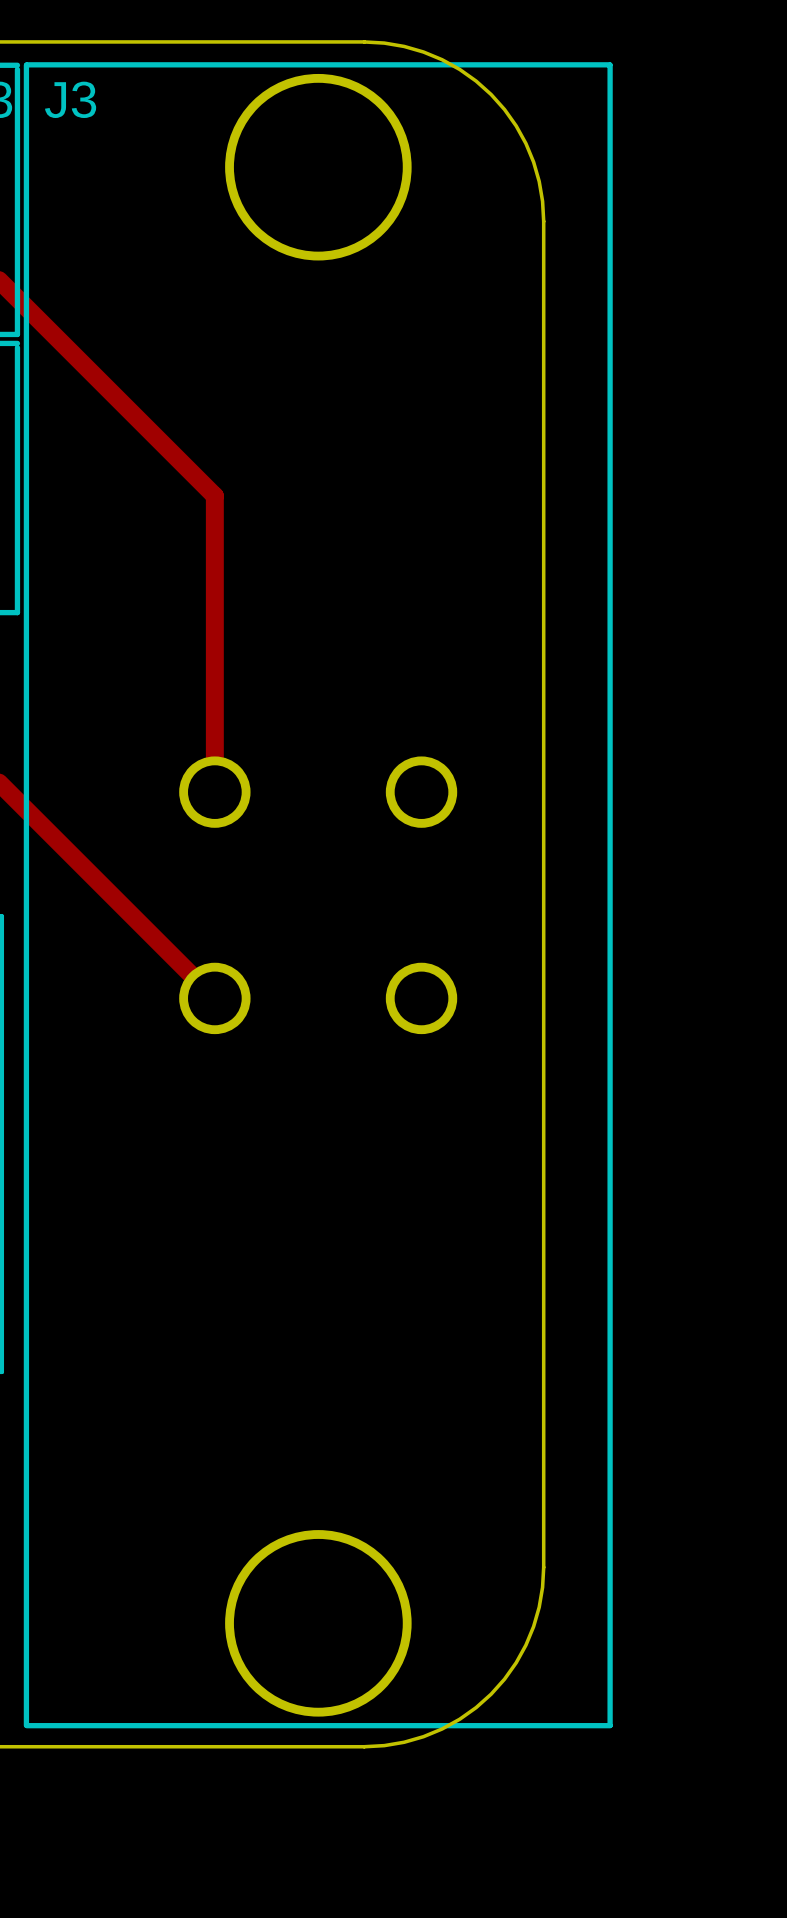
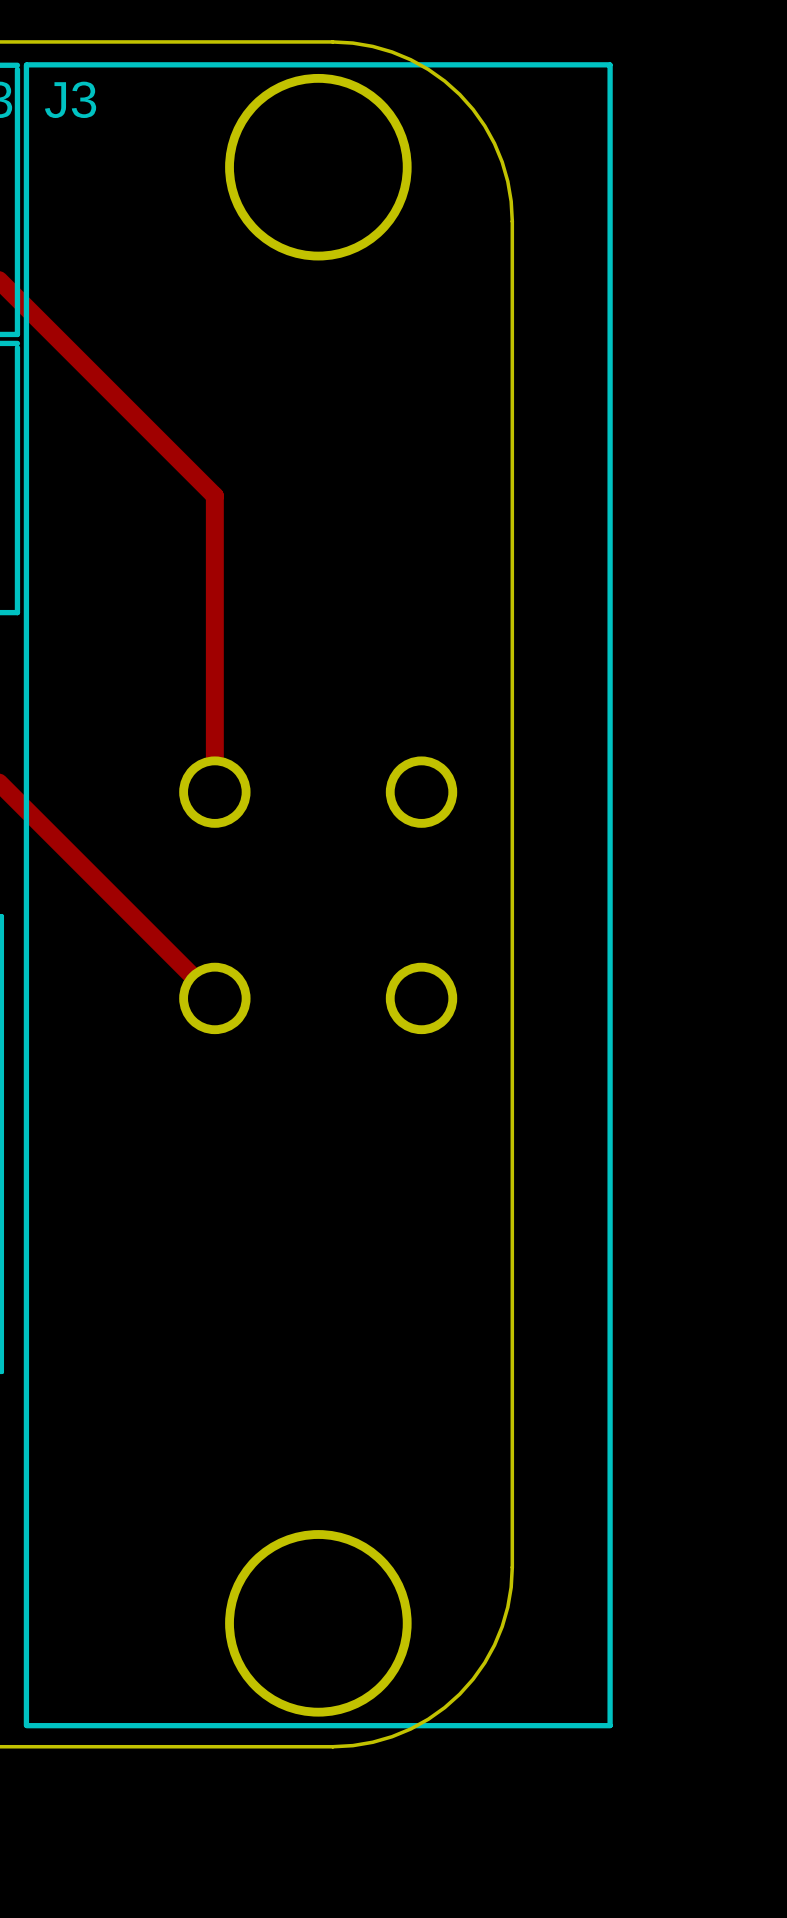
board edge: (332, 41) (384, 43) (404, 46) (442, 59) (476, 81) (504, 109) (525, 143) (539, 181) (543, 221) (542, 1587) (533, 1626) (516, 1662) (491, 1694) (476, 1707) (442, 1728) (404, 1742) (384, 1745) (332, 1746) -> (332, 41) (372, 46) (410, 59) (444, 81) (459, 94) (484, 125) (494, 143) (507, 181) (512, 221) (511, 1587) (502, 1626) (494, 1645) (484, 1662) (459, 1694) (444, 1707) (410, 1728) (372, 1742) (332, 1746)

